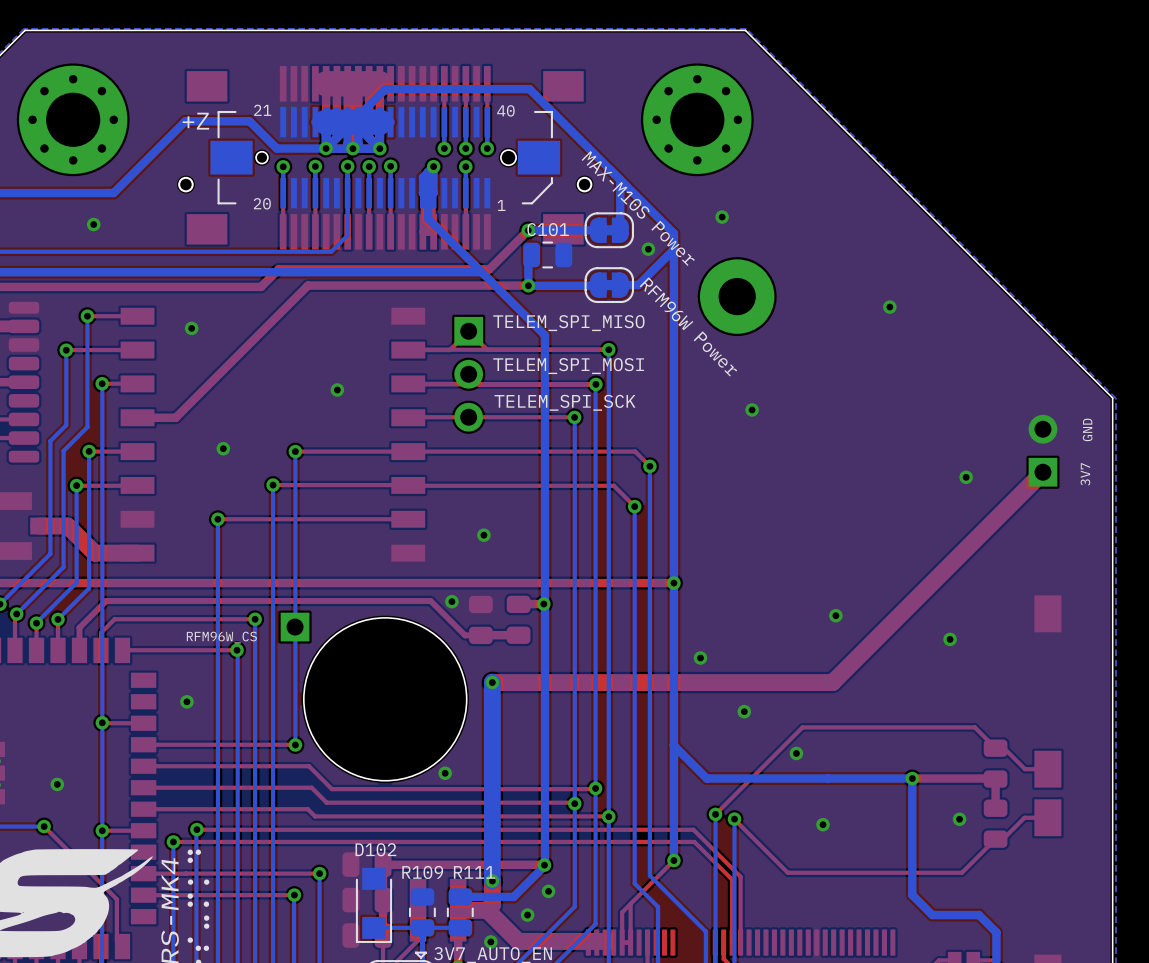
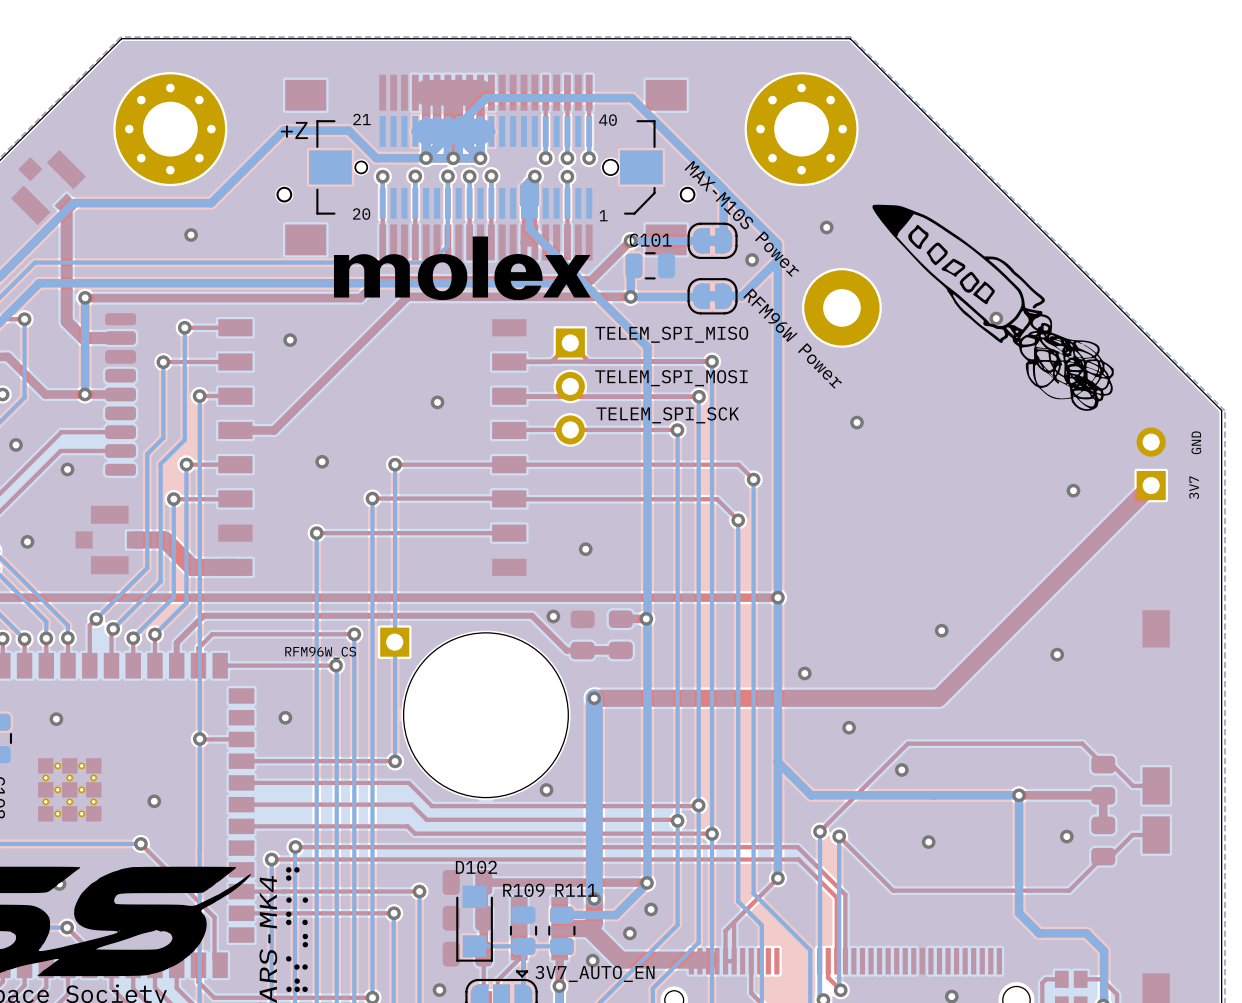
drawing: none -> [872, 204, 1114, 411]
drawing: none -> [333, 236, 591, 301]
via: (102, 830) -> none
top track: (143, 830) (102, 830) -> none

